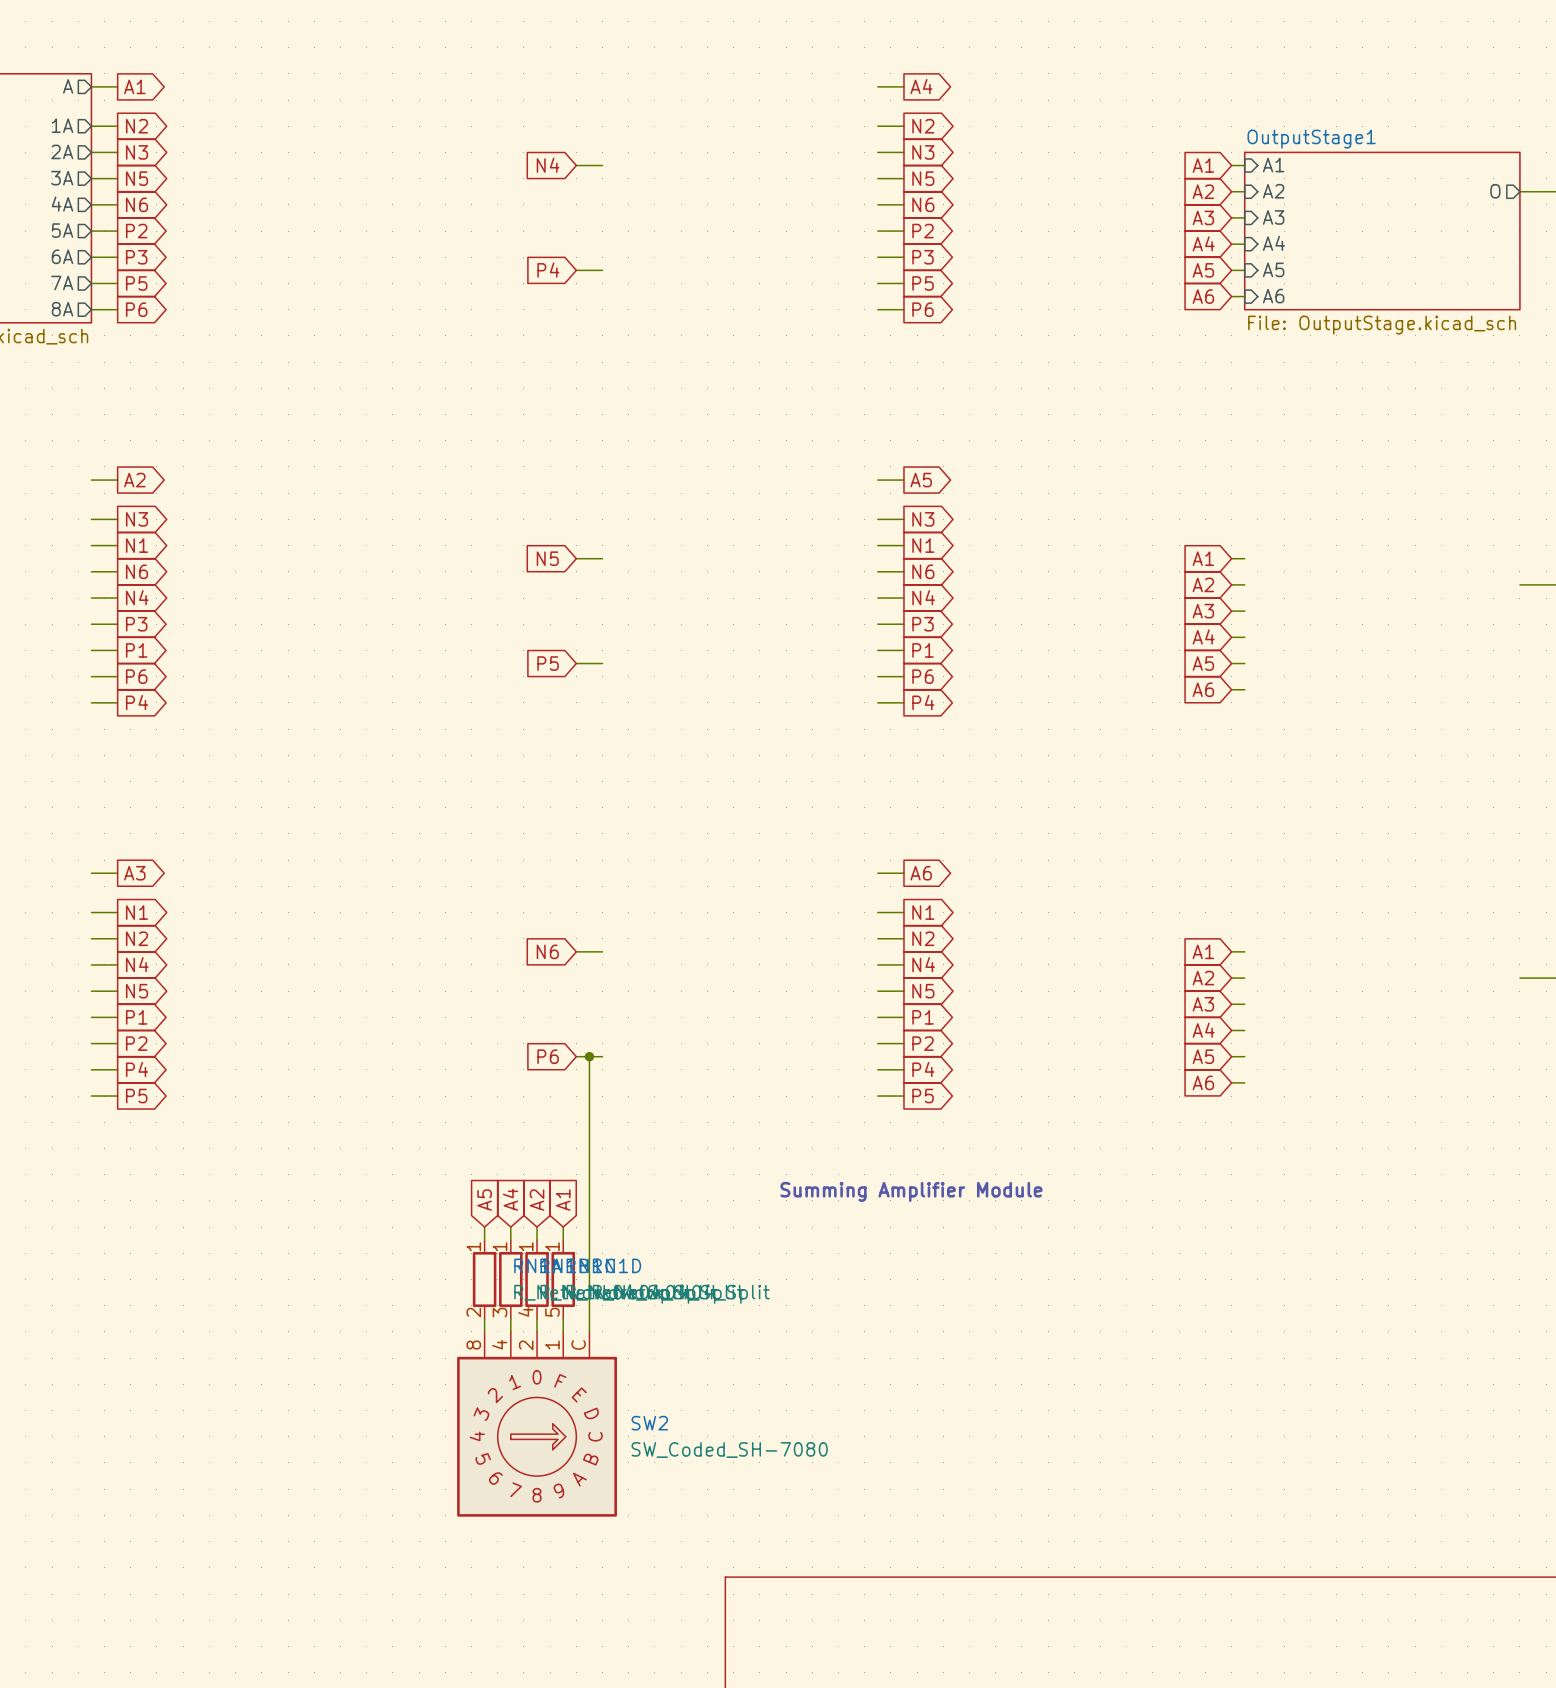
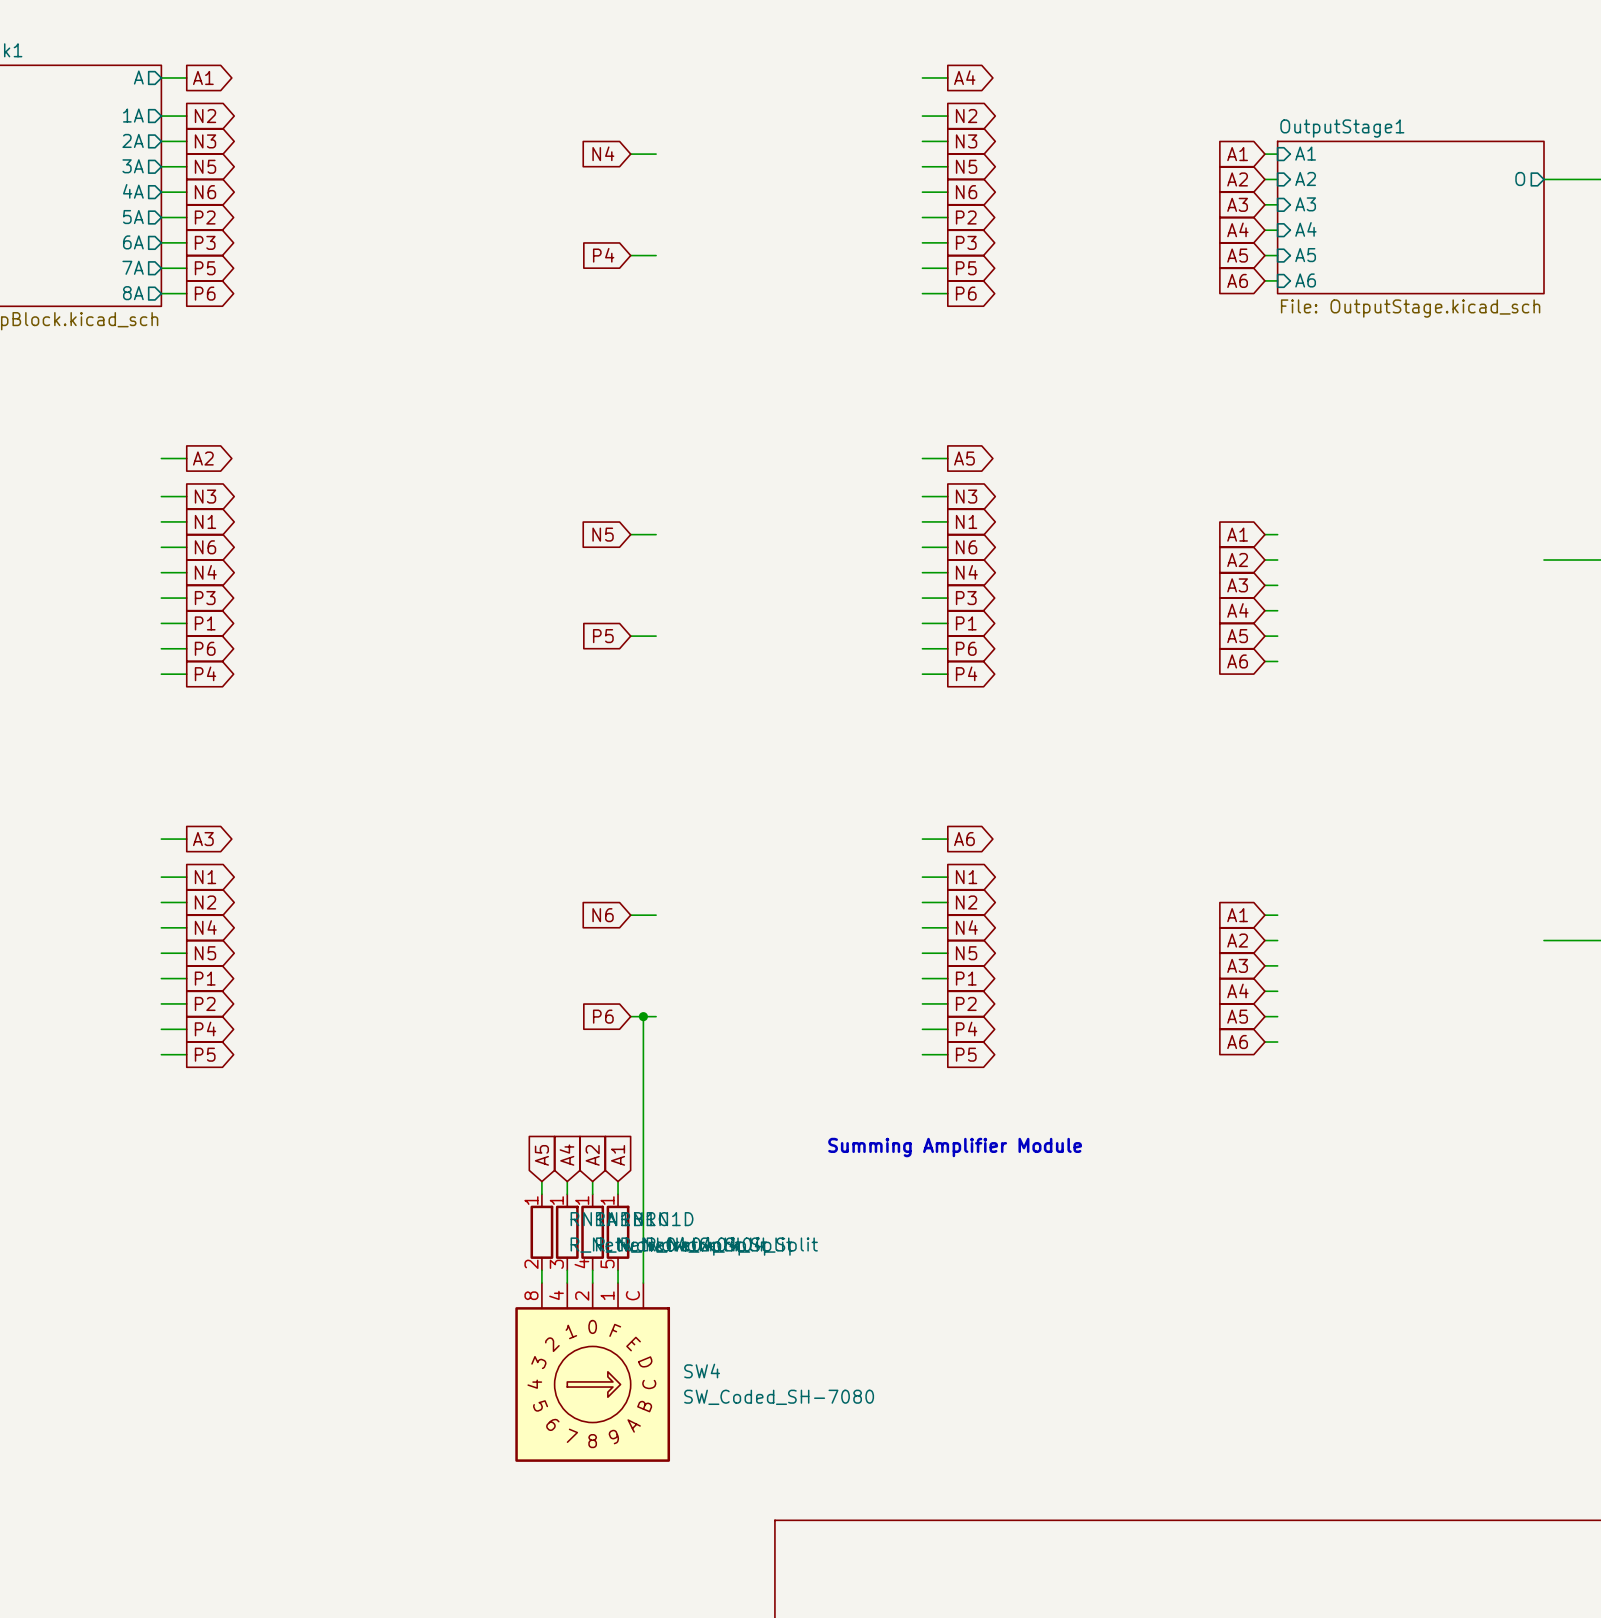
SW2 name: SW2 (649, 1423) -> SW4 (702, 1371)

